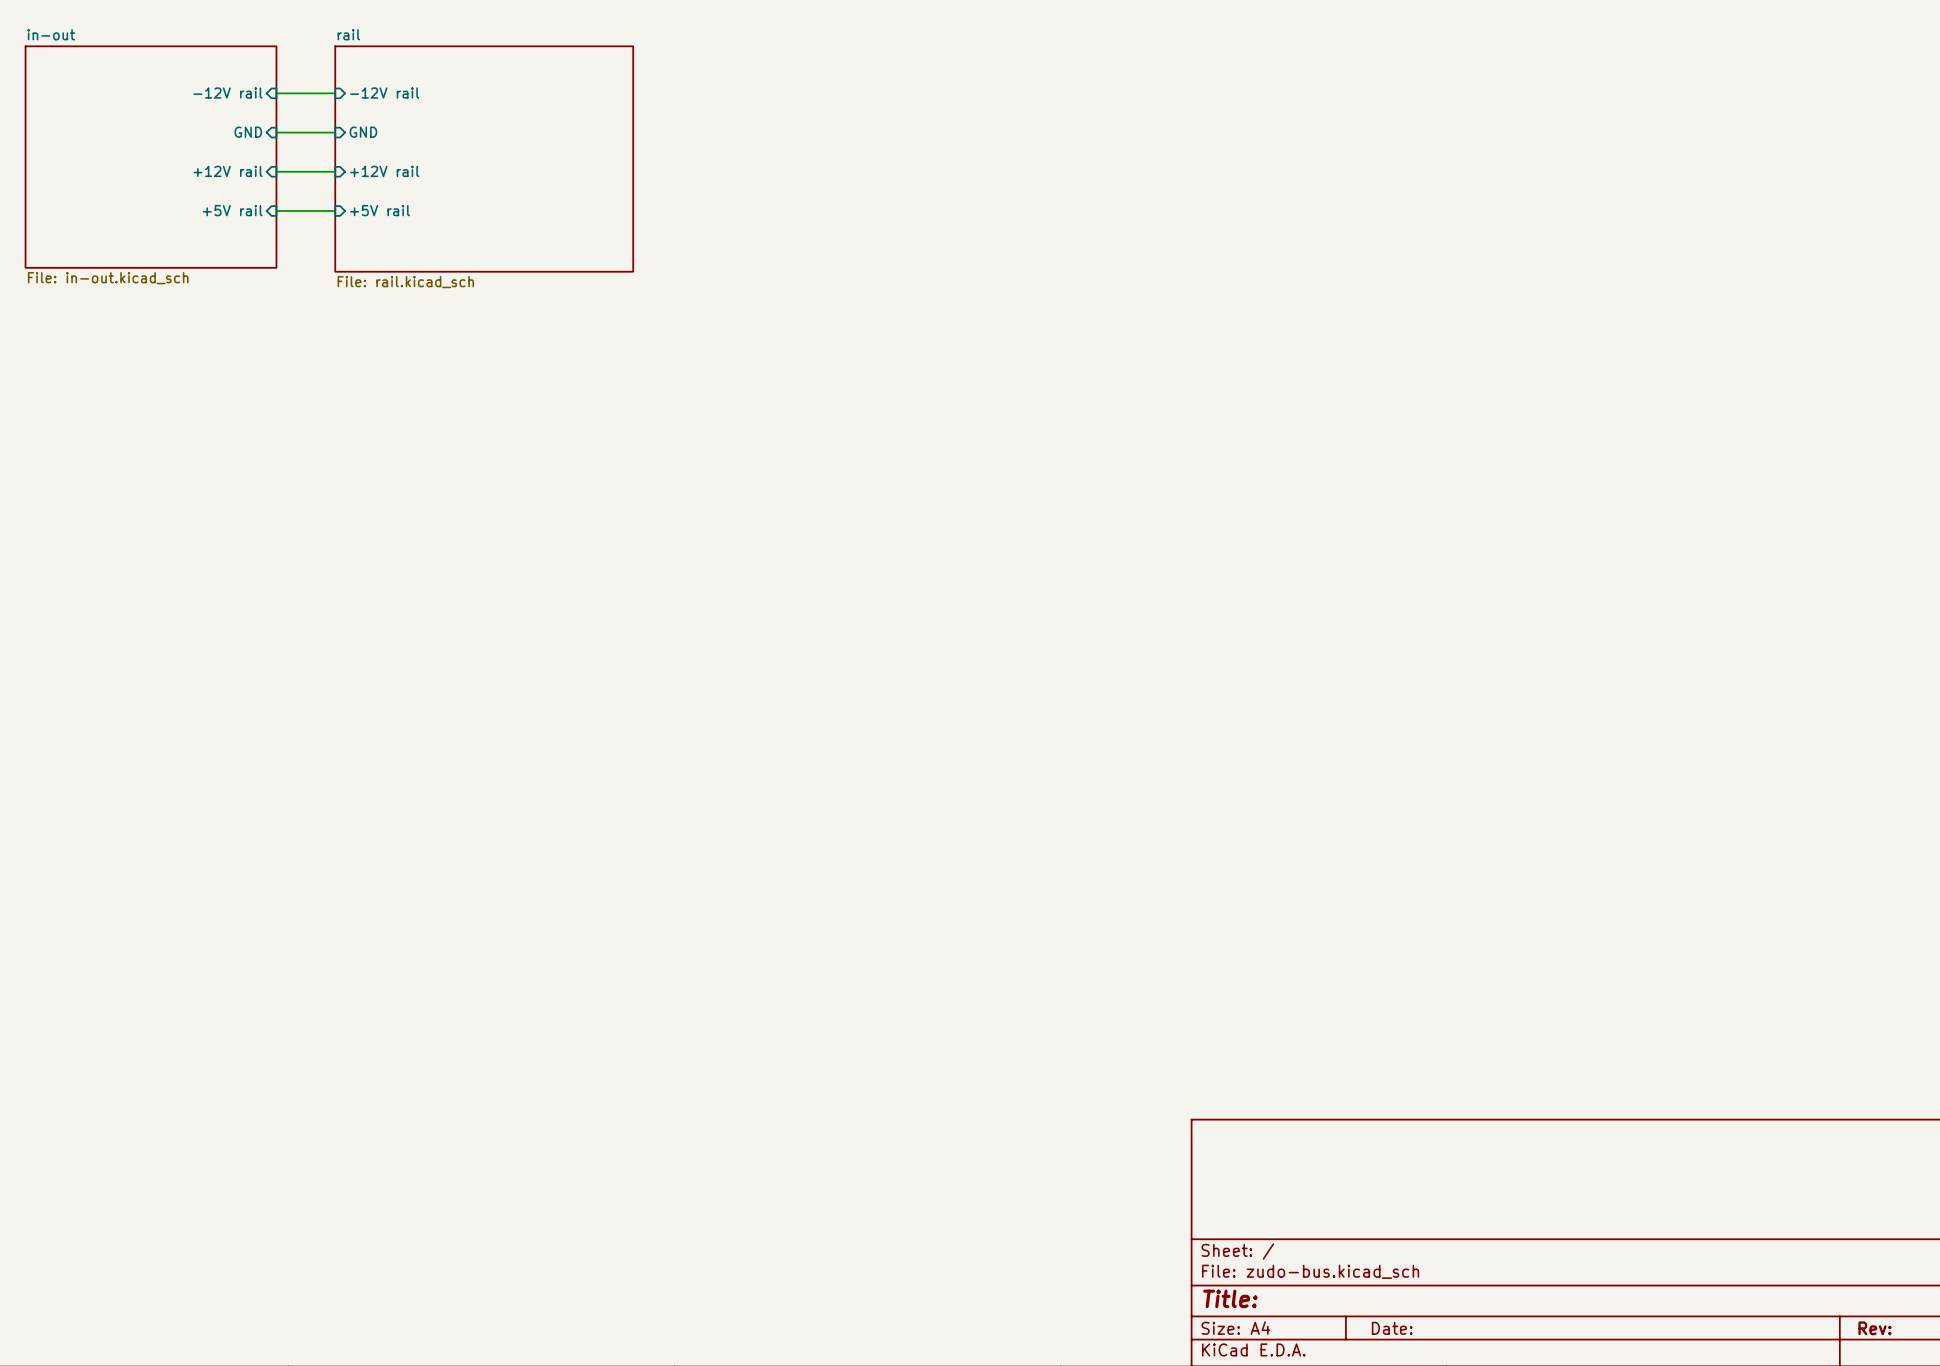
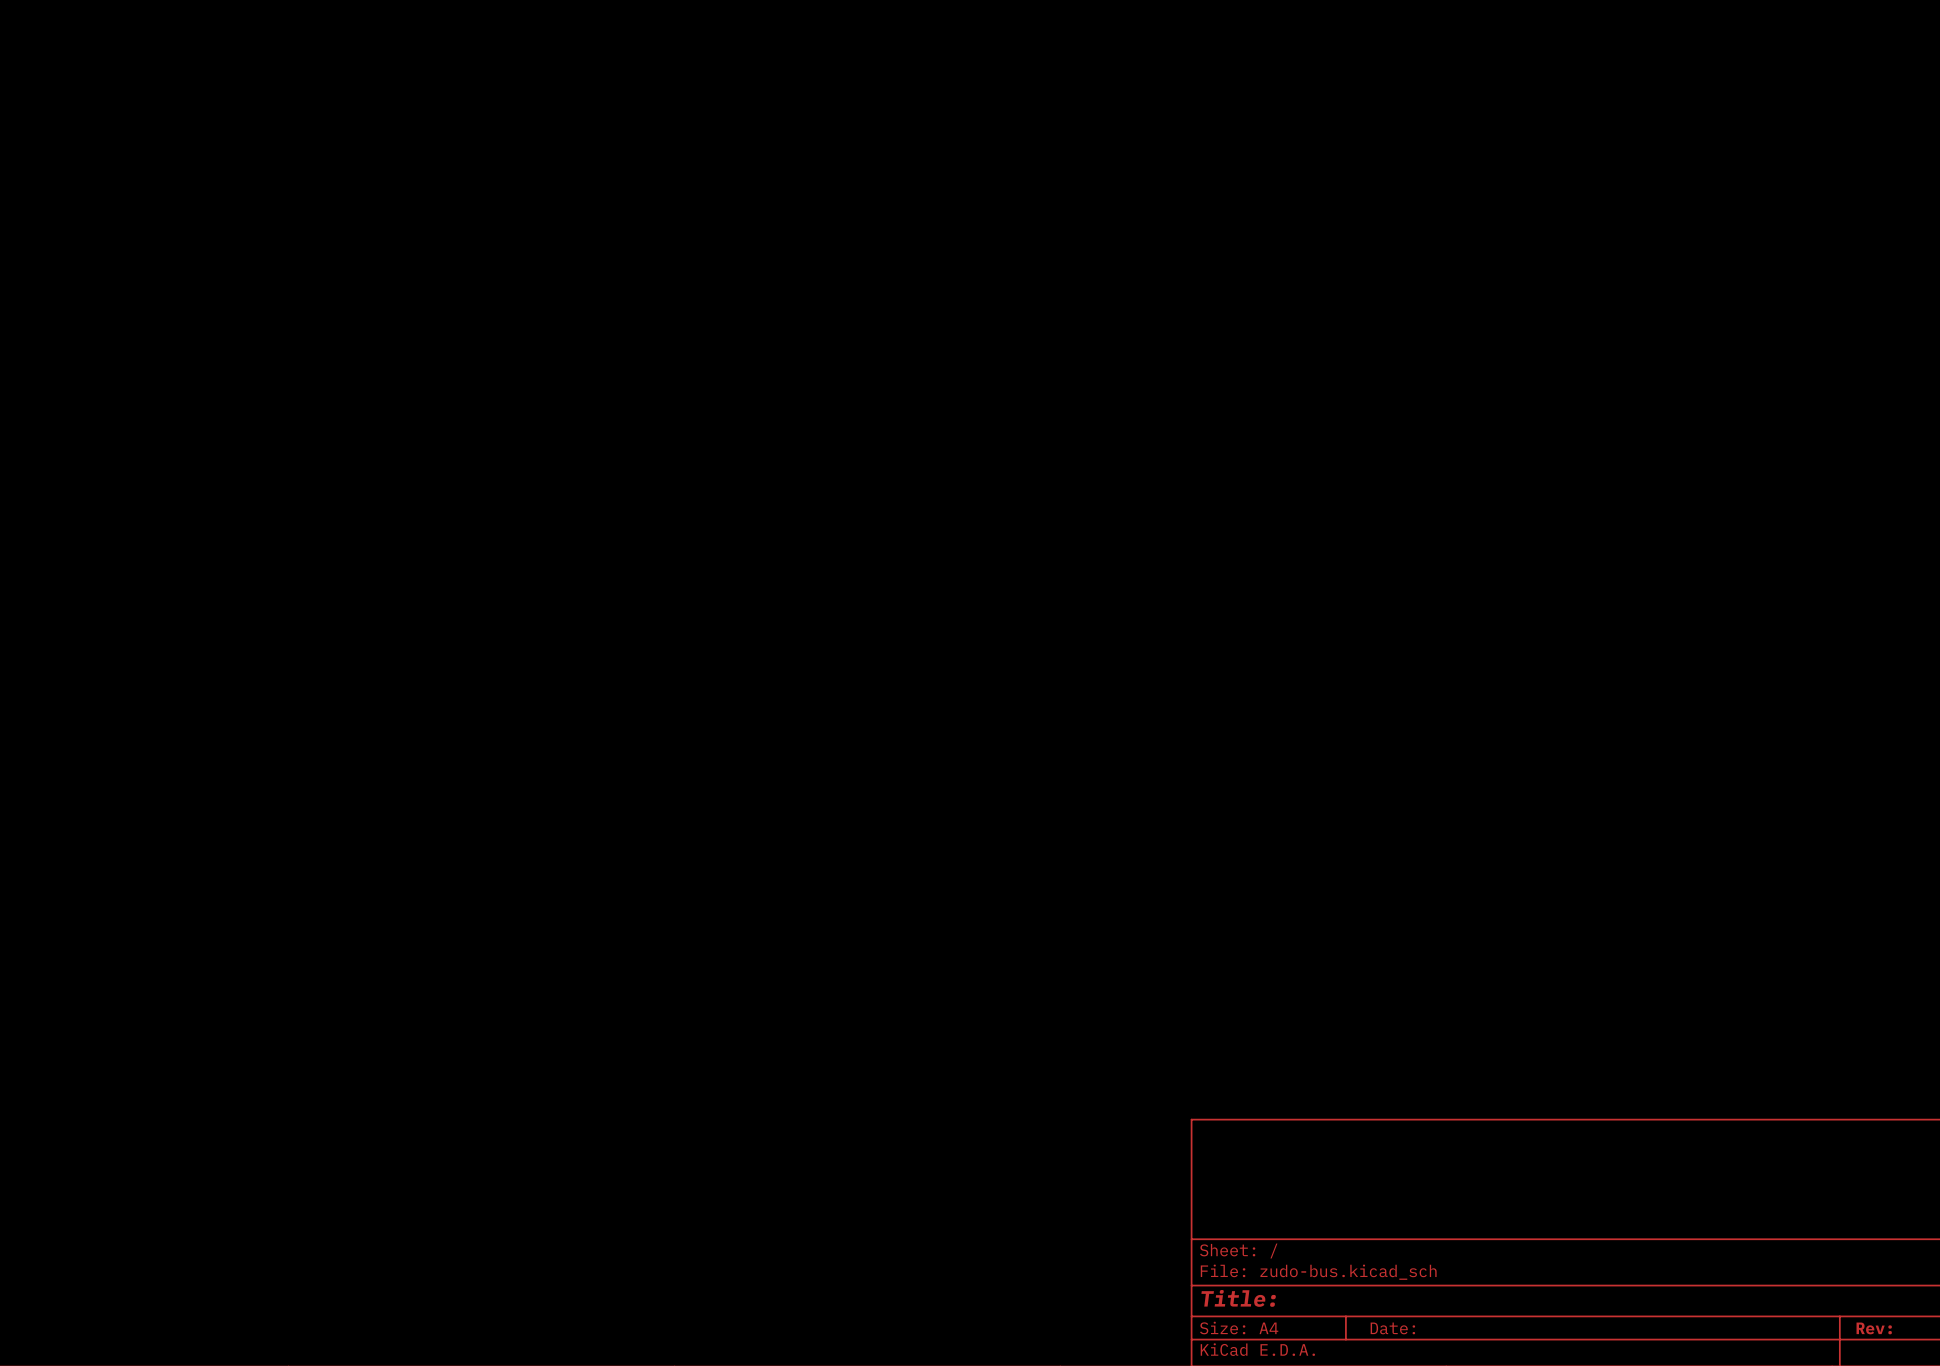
sheet pin: -12V rail (227, 93) -> none
wire: (276, 93) (335, 93) -> none
sheet pin: -12V rail (384, 93) -> none
sheet pin: GND (248, 132) -> none
wire: (276, 132) (335, 132) -> none
sheet pin: GND (363, 132) -> none
sheet in-out: File: in-out.kicad_sch (151, 157) -> none
sheet rail: File: rail.kicad_sch (484, 159) -> none
sheet pin: +12V rail (227, 171) -> none
wire: (276, 171) (335, 171) -> none
sheet pin: +12V rail (384, 171) -> none
sheet pin: +5V rail (232, 210) -> none
wire: (276, 210) (335, 210) -> none
sheet pin: +5V rail (379, 210) -> none

